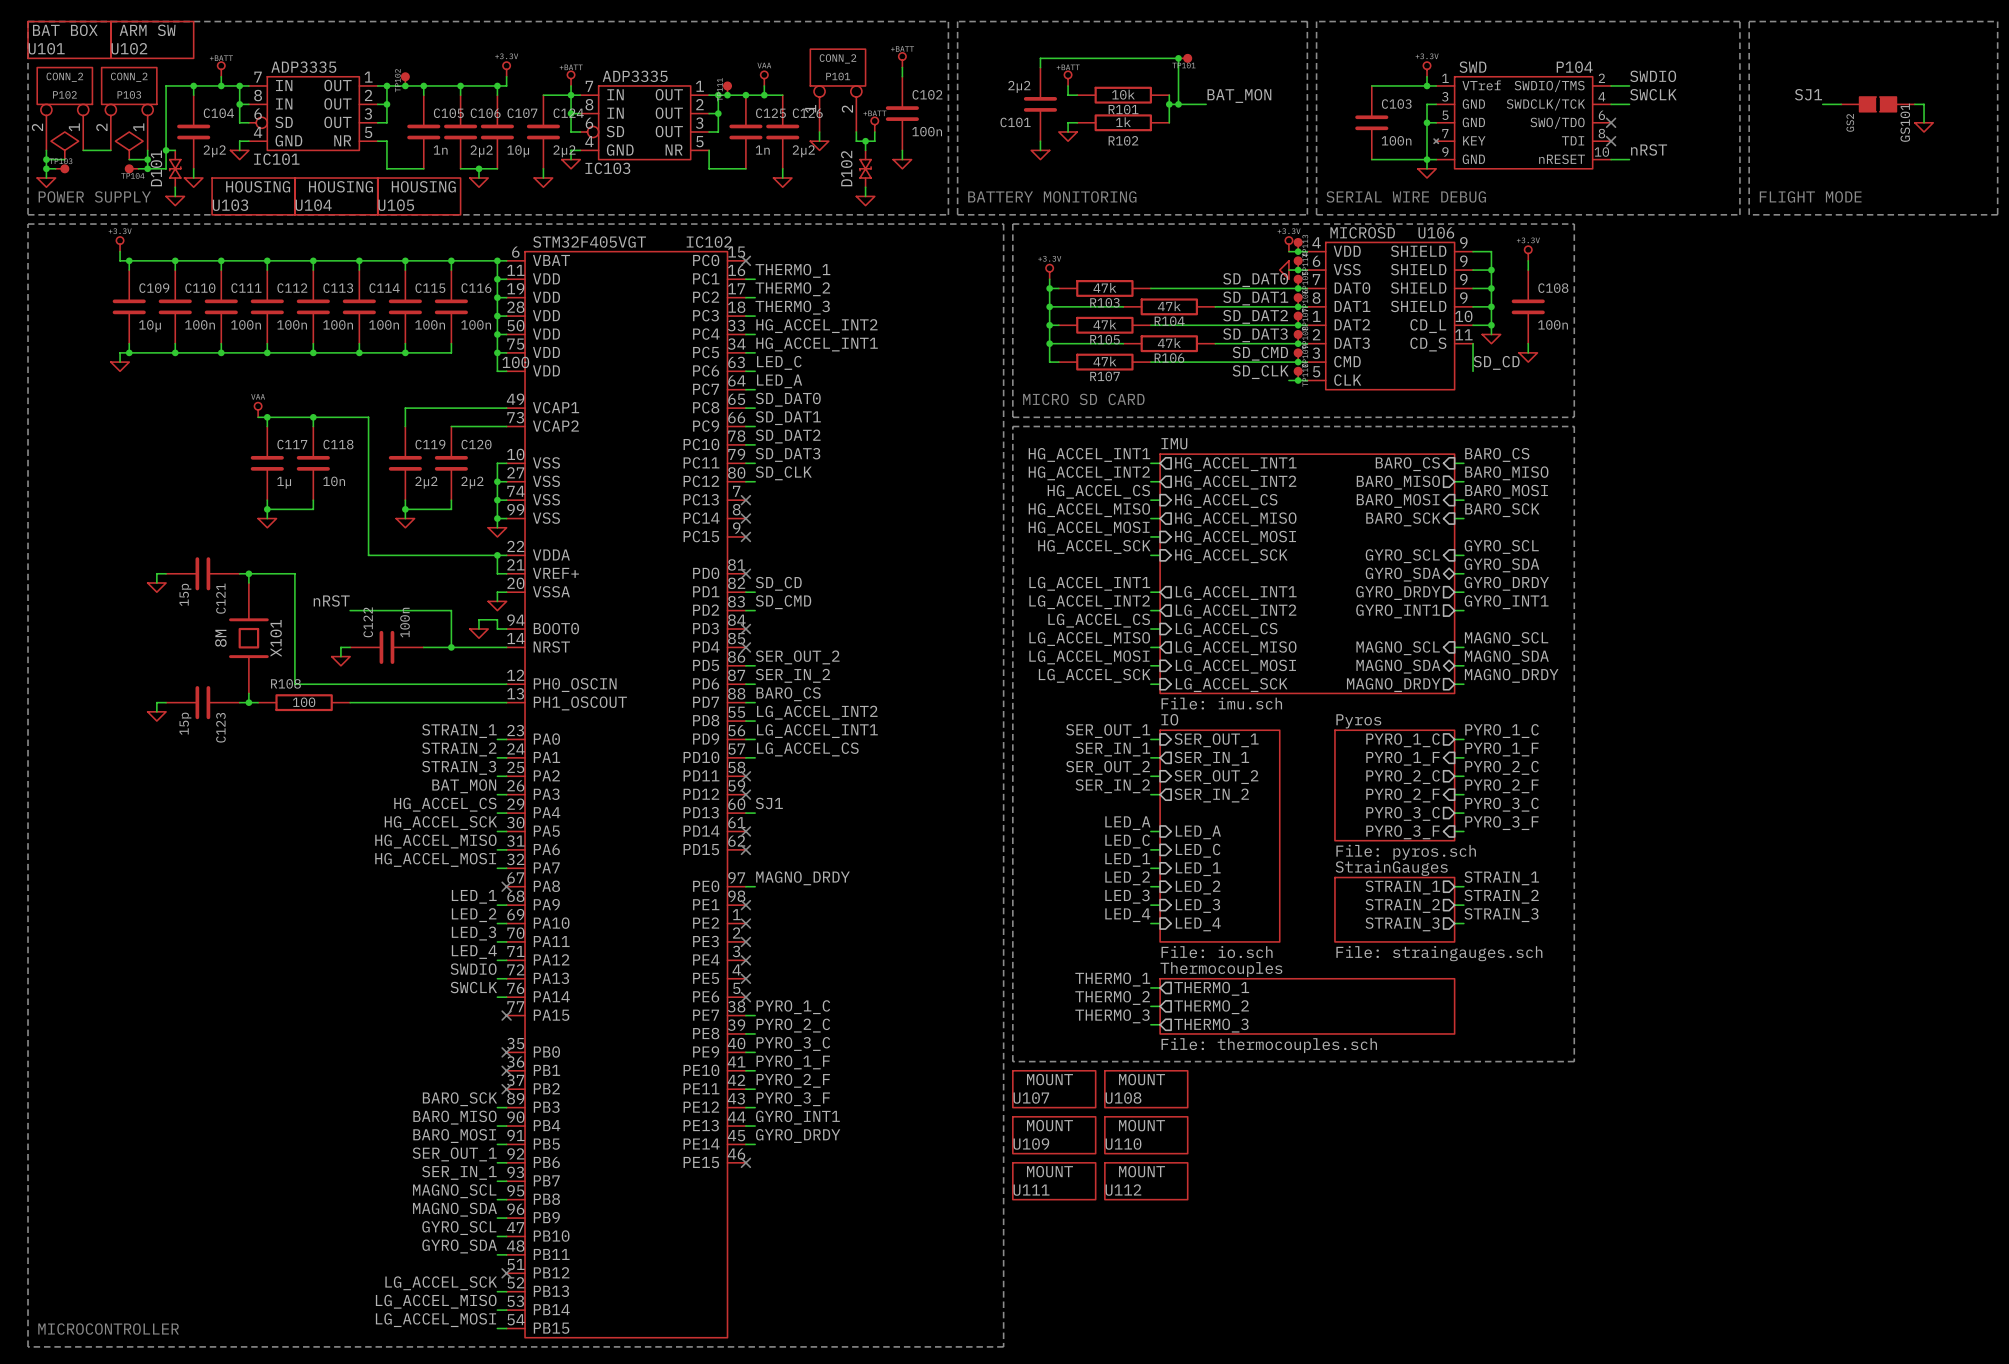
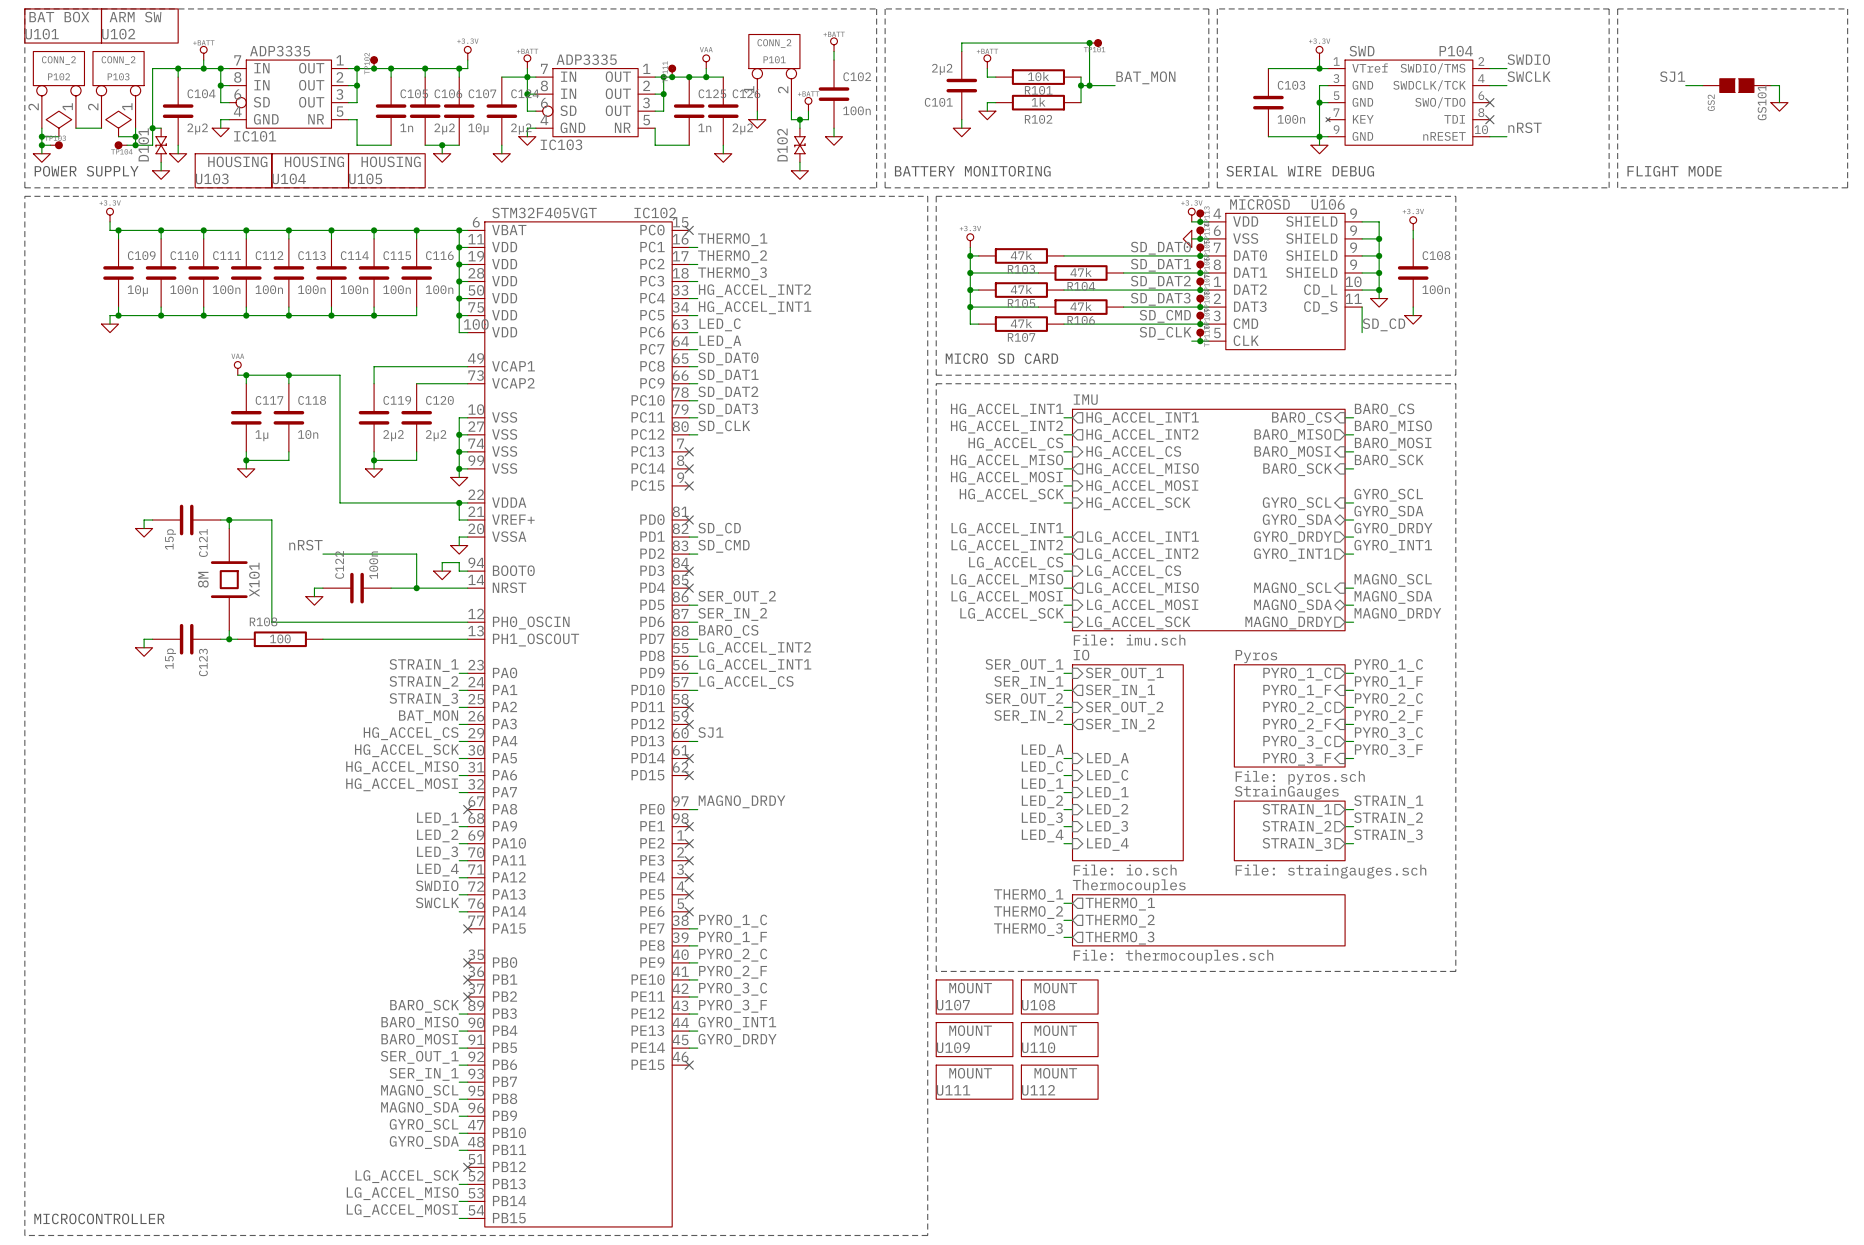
label: PYRO_2_C (793, 1025) -> PYRO_1_F (733, 938)
label: PYRO_3_C (793, 1044) -> PYRO_2_C (733, 955)
label: PYRO_1_F (793, 1062) -> PYRO_2_F (733, 972)
label: PYRO_2_F (793, 1080) -> PYRO_3_C (733, 989)

